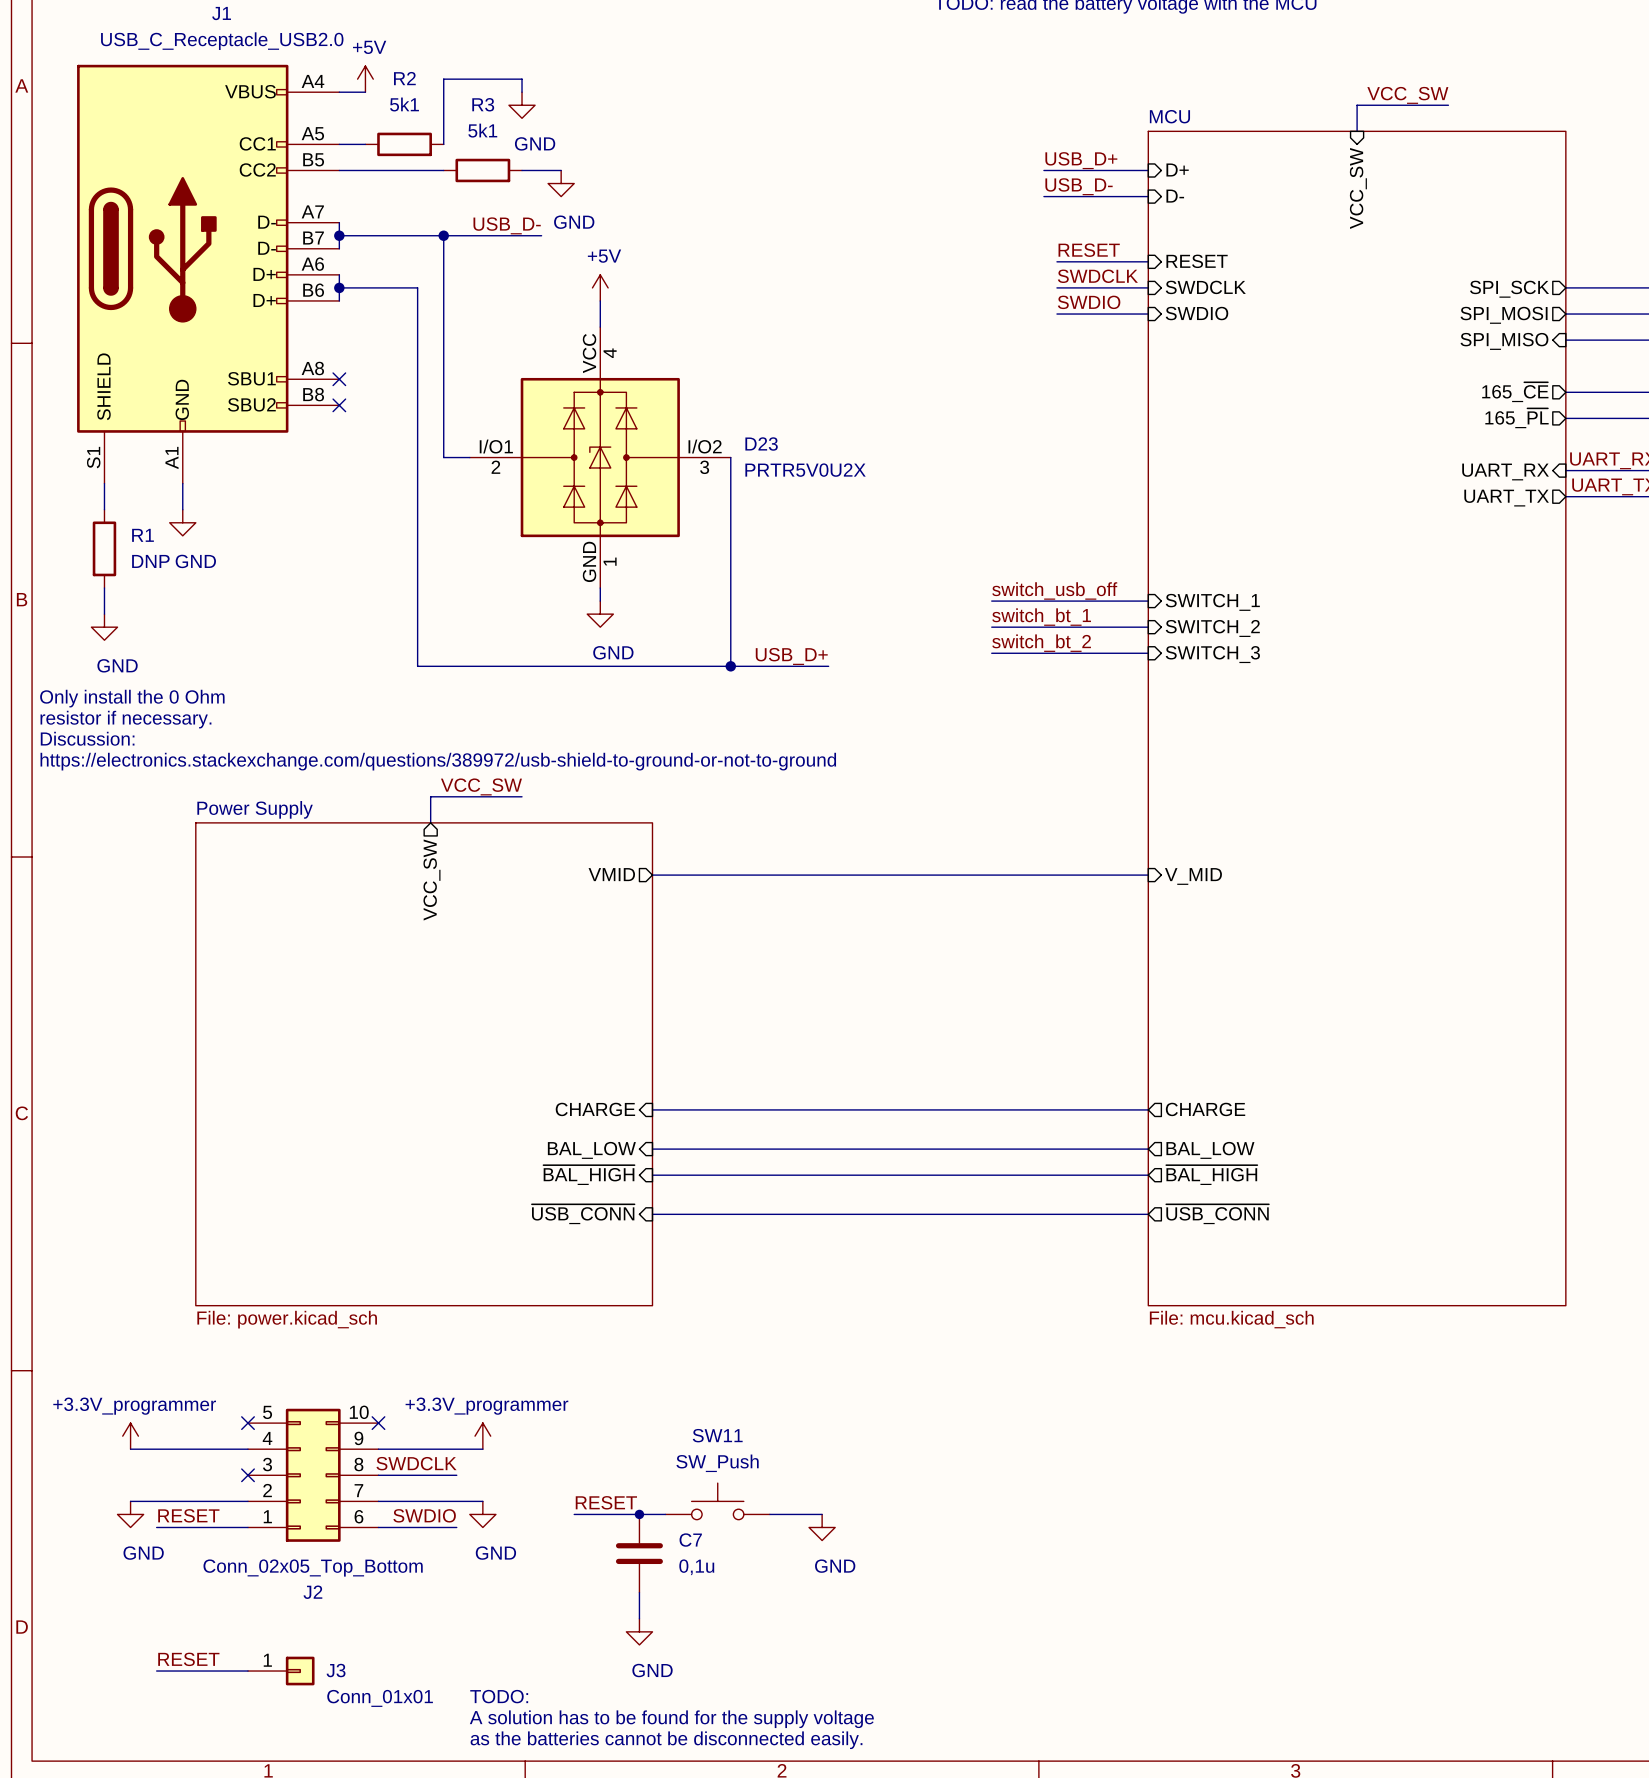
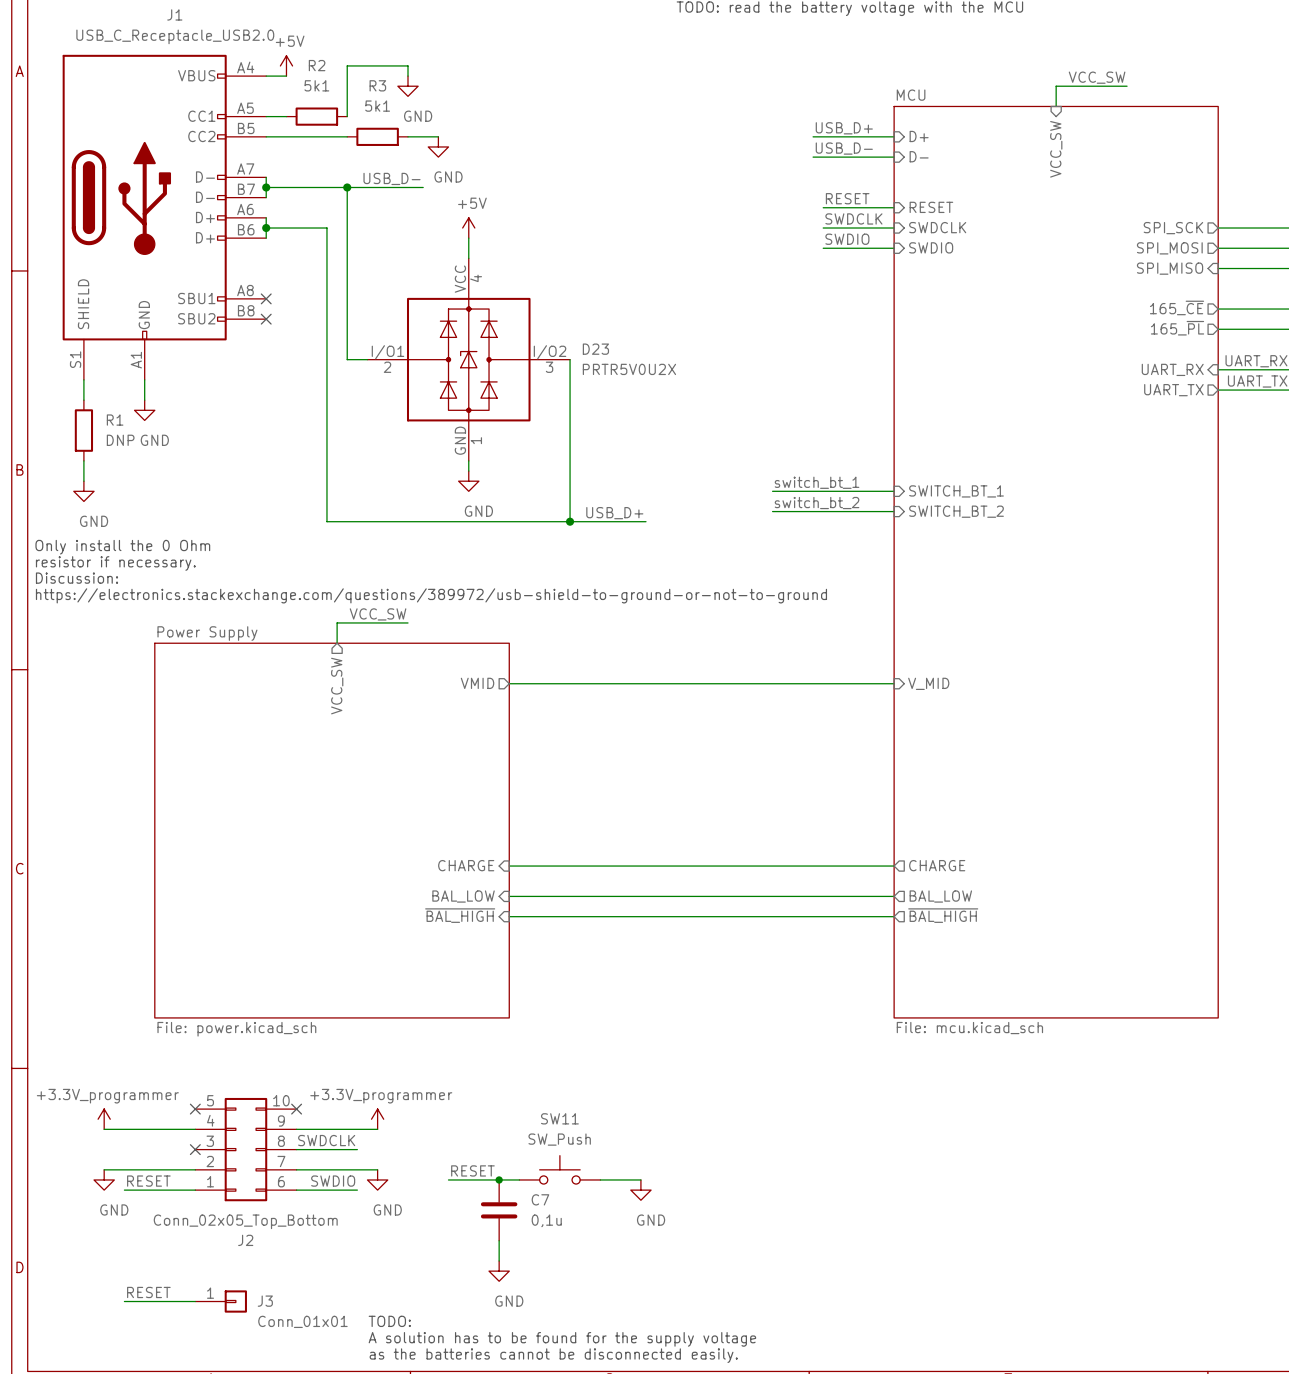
label: switch_usb_off (1054, 590) -> none
wire: (991, 601) (1148, 601) -> none
sheet pin: SWITCH_1 (1212, 602) -> none
sheet pin: SWITCH_2 (1212, 628) -> SWITCH_BT_1 (956, 491)
sheet pin: SWITCH_3 (1212, 654) -> SWITCH_BT_2 (956, 511)
sheet pin: ~{USB_CONN} (583, 1214) -> none
wire: (652, 1214) (1148, 1214) -> none
sheet pin: ~{USB_CONN} (1217, 1214) -> none

